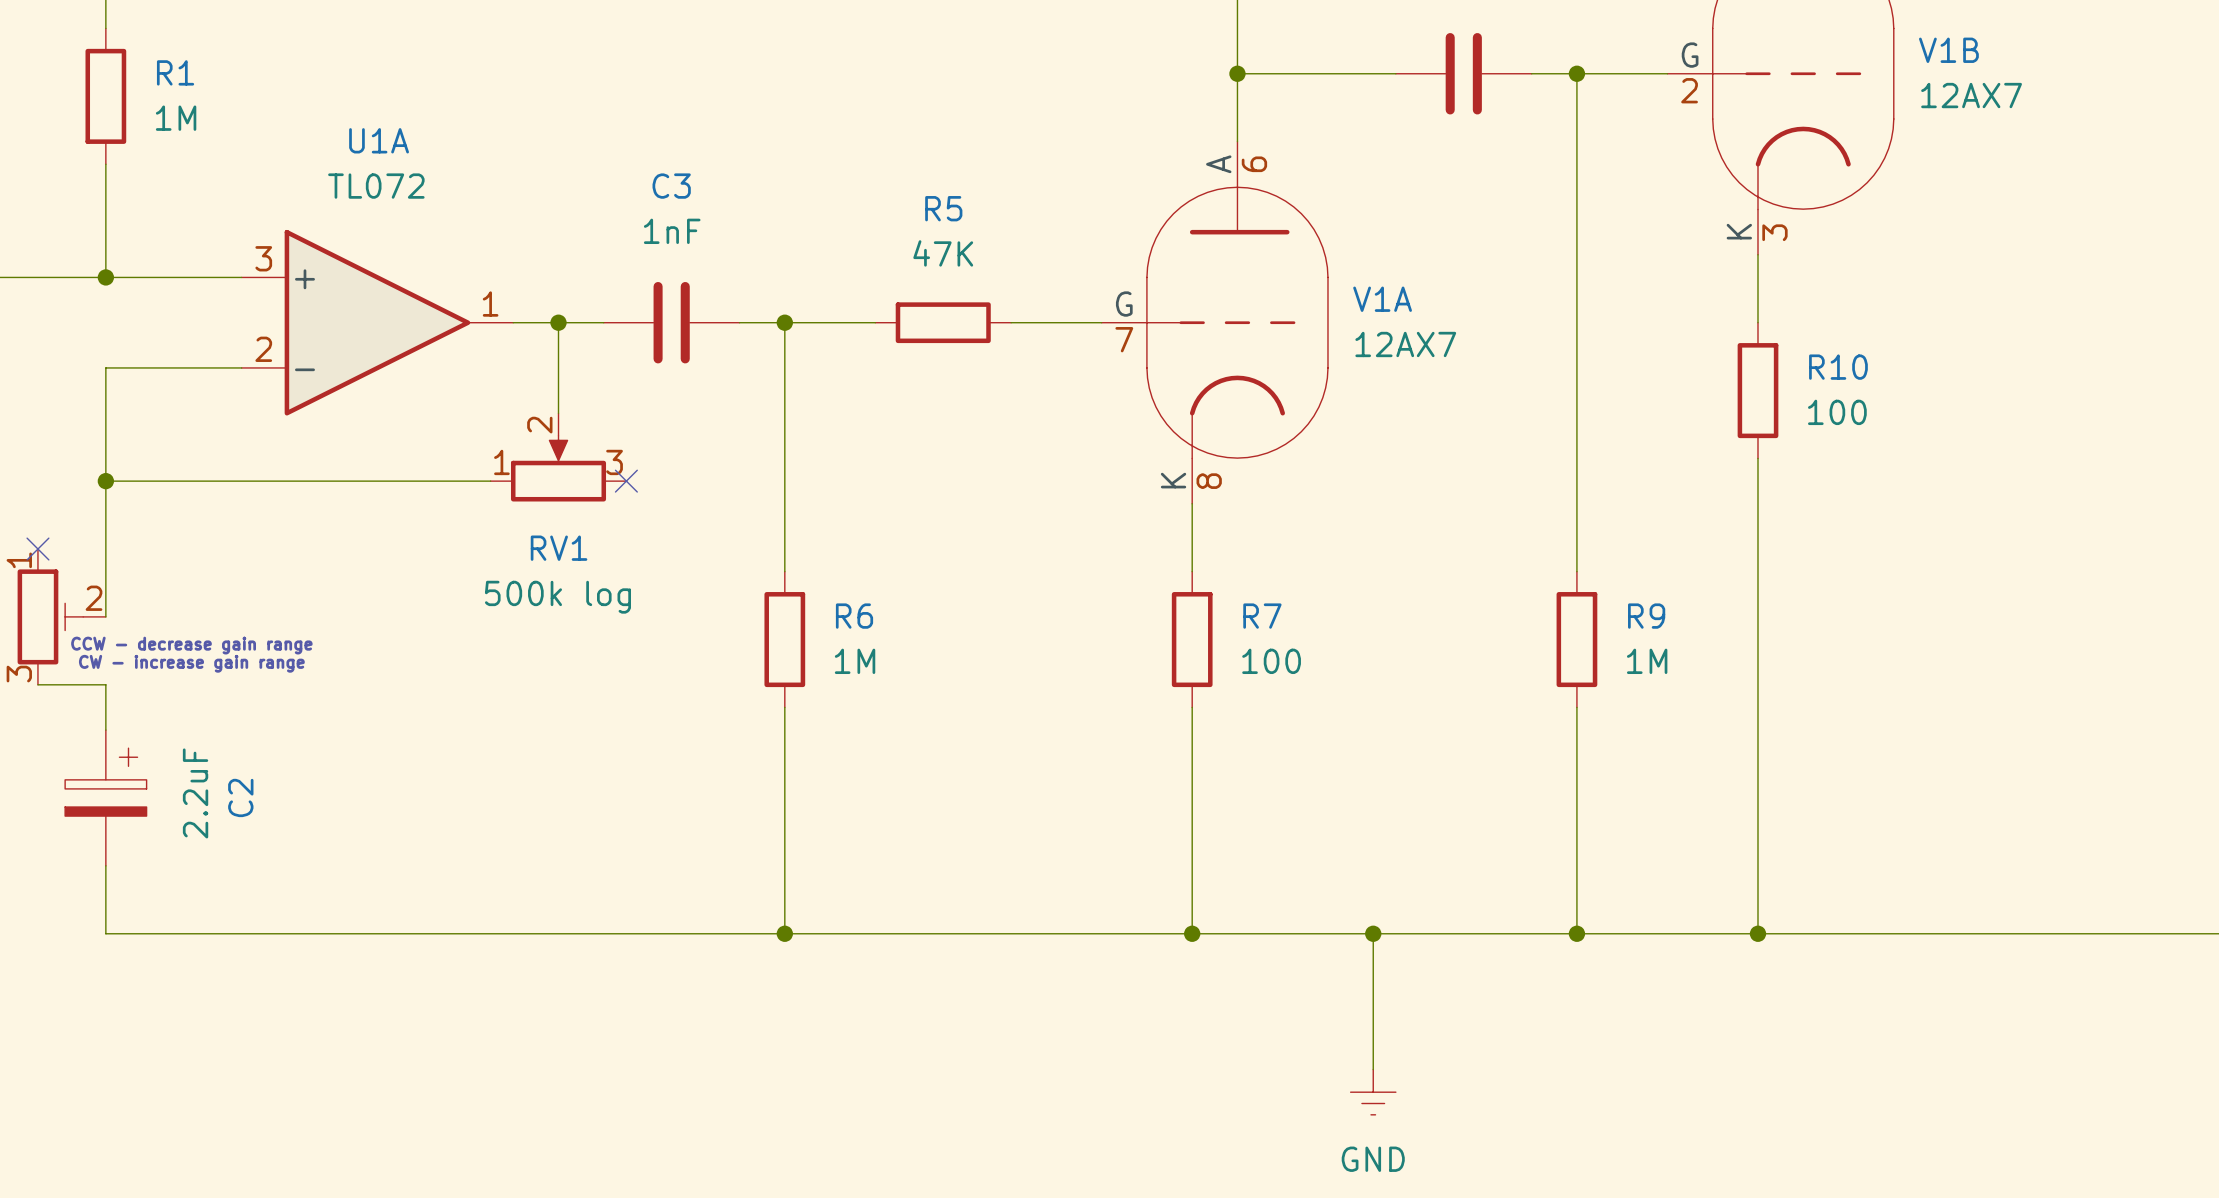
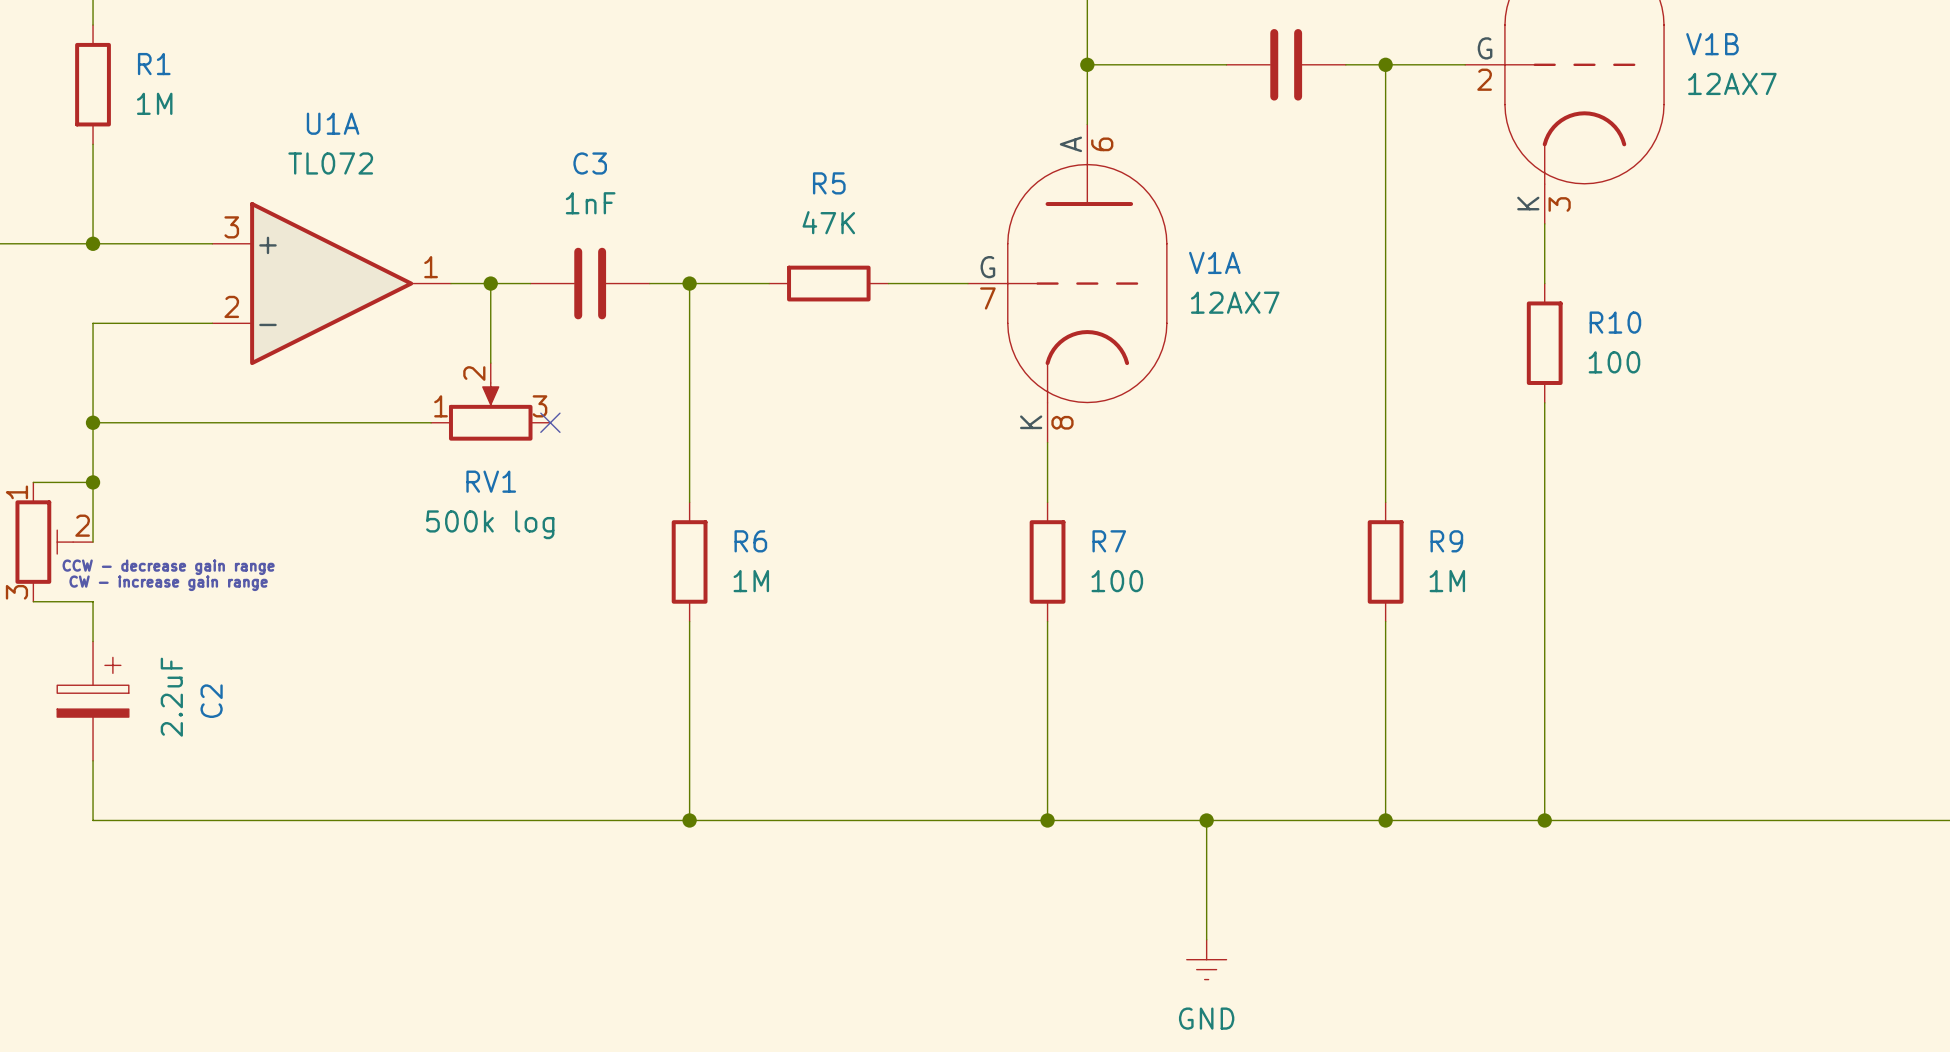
wire: none -> (33, 482) (93, 482)
no-connect mark: (37, 549) -> none
junction: none -> (93, 482)

